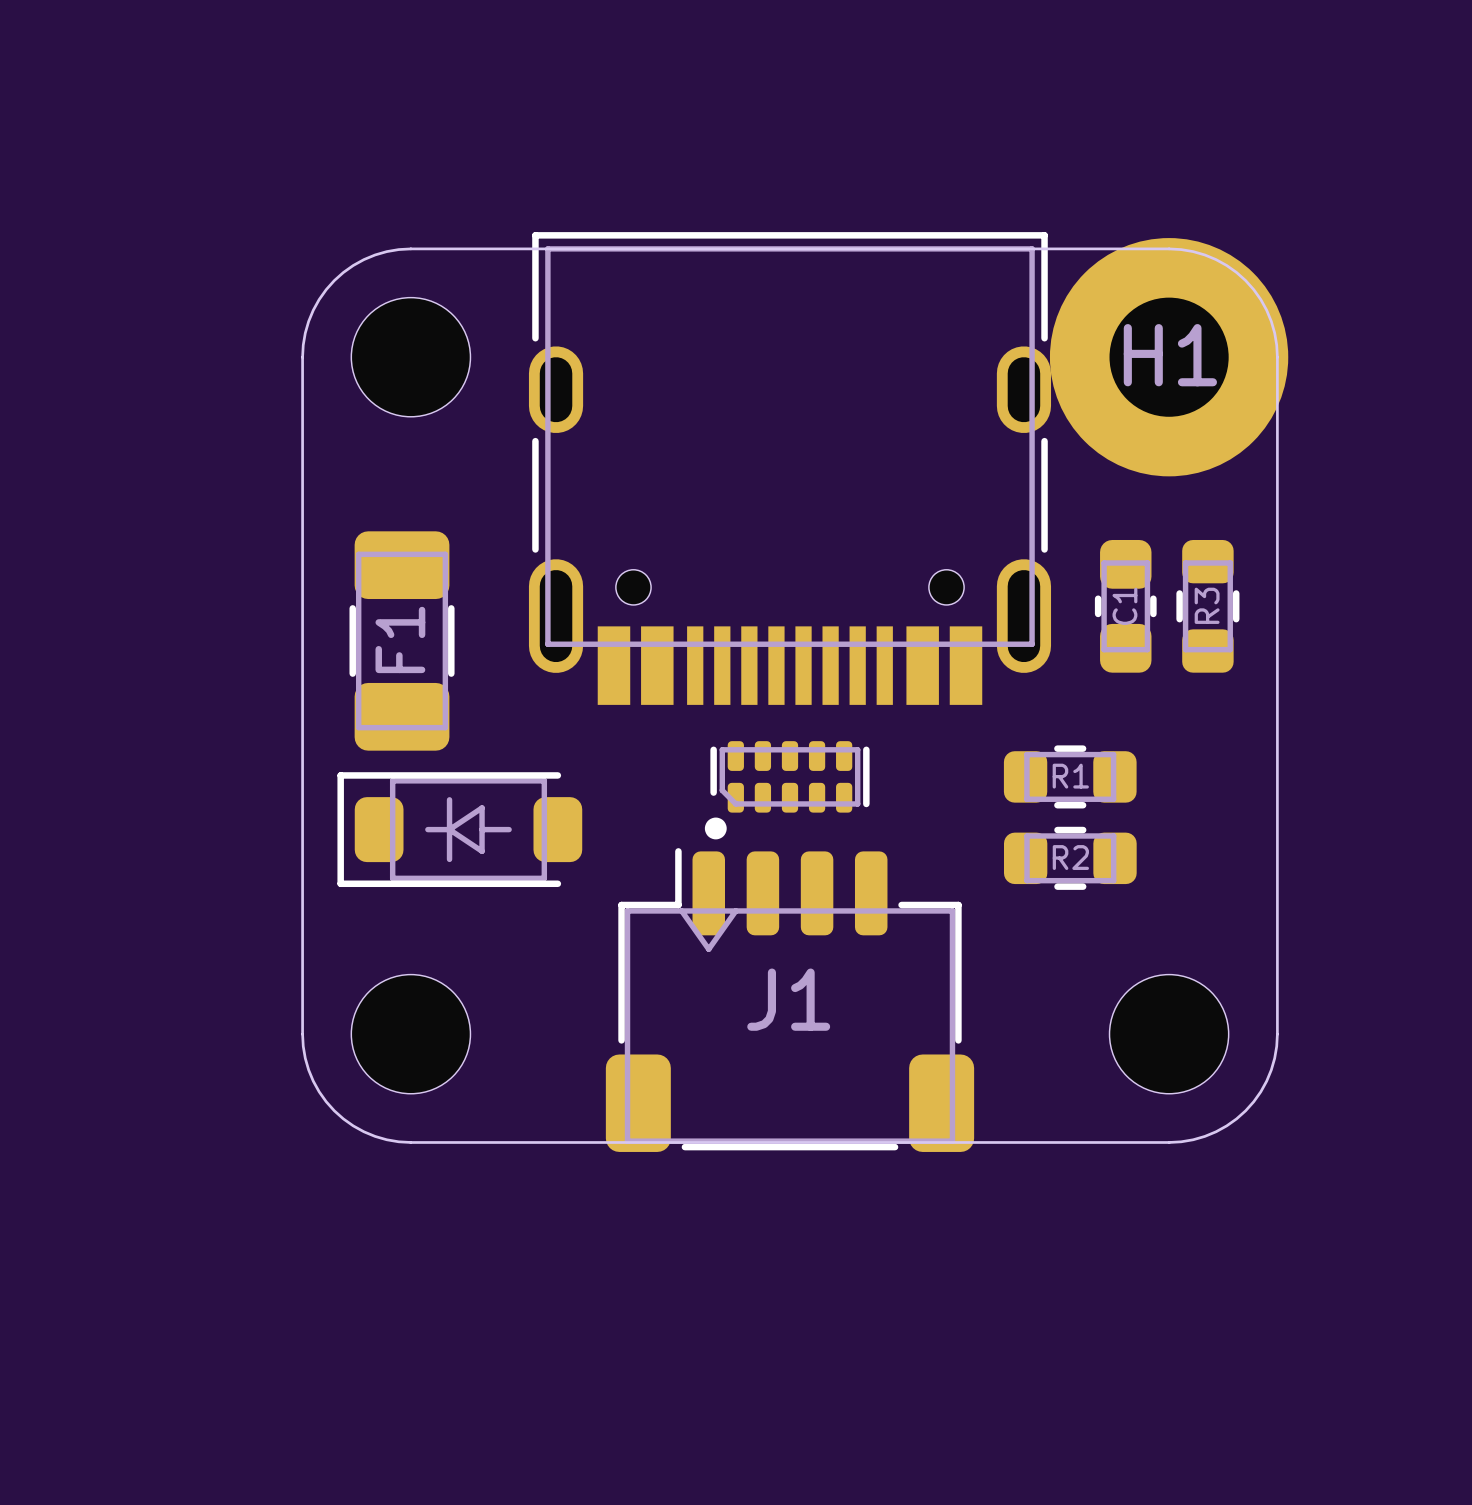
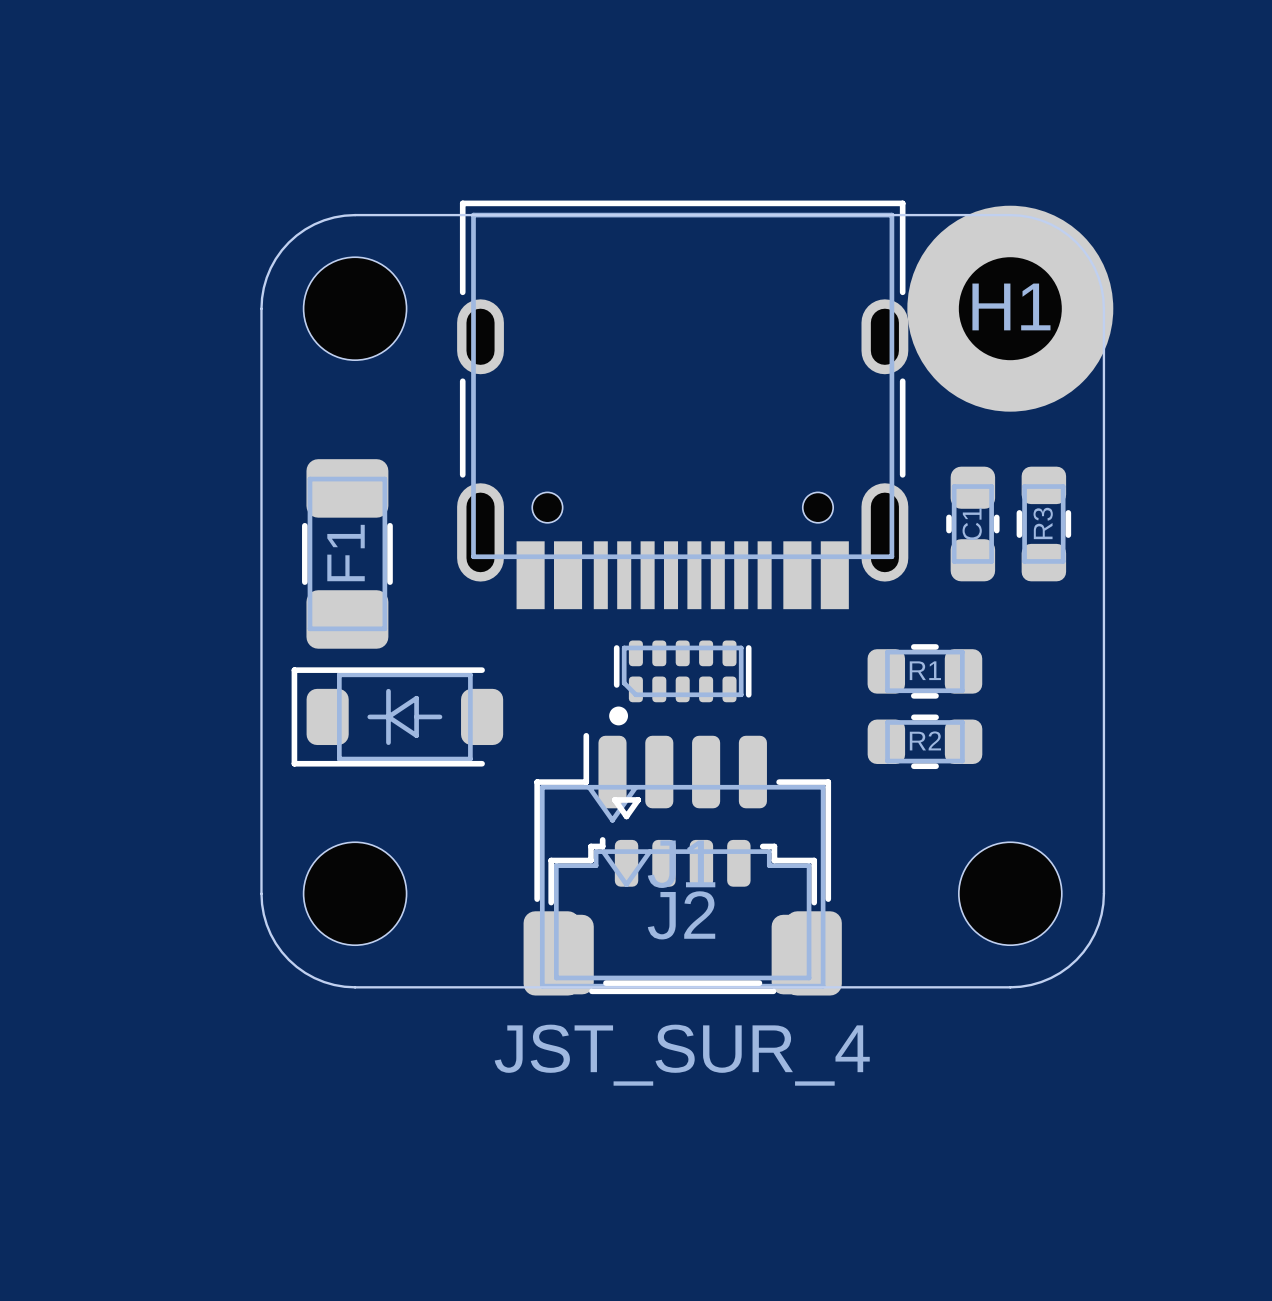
J2: none -> JST_SUR_4 (682, 895)

